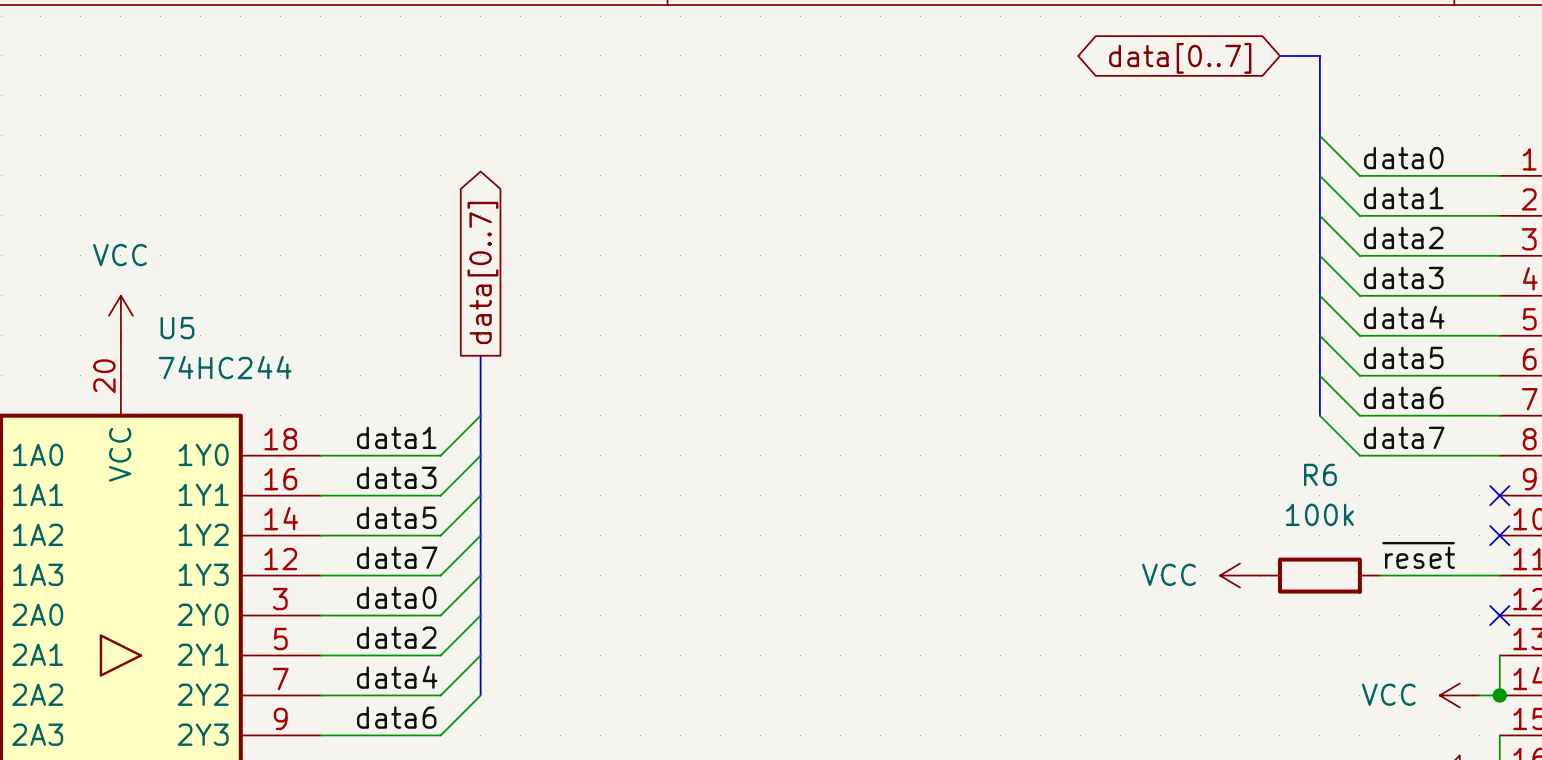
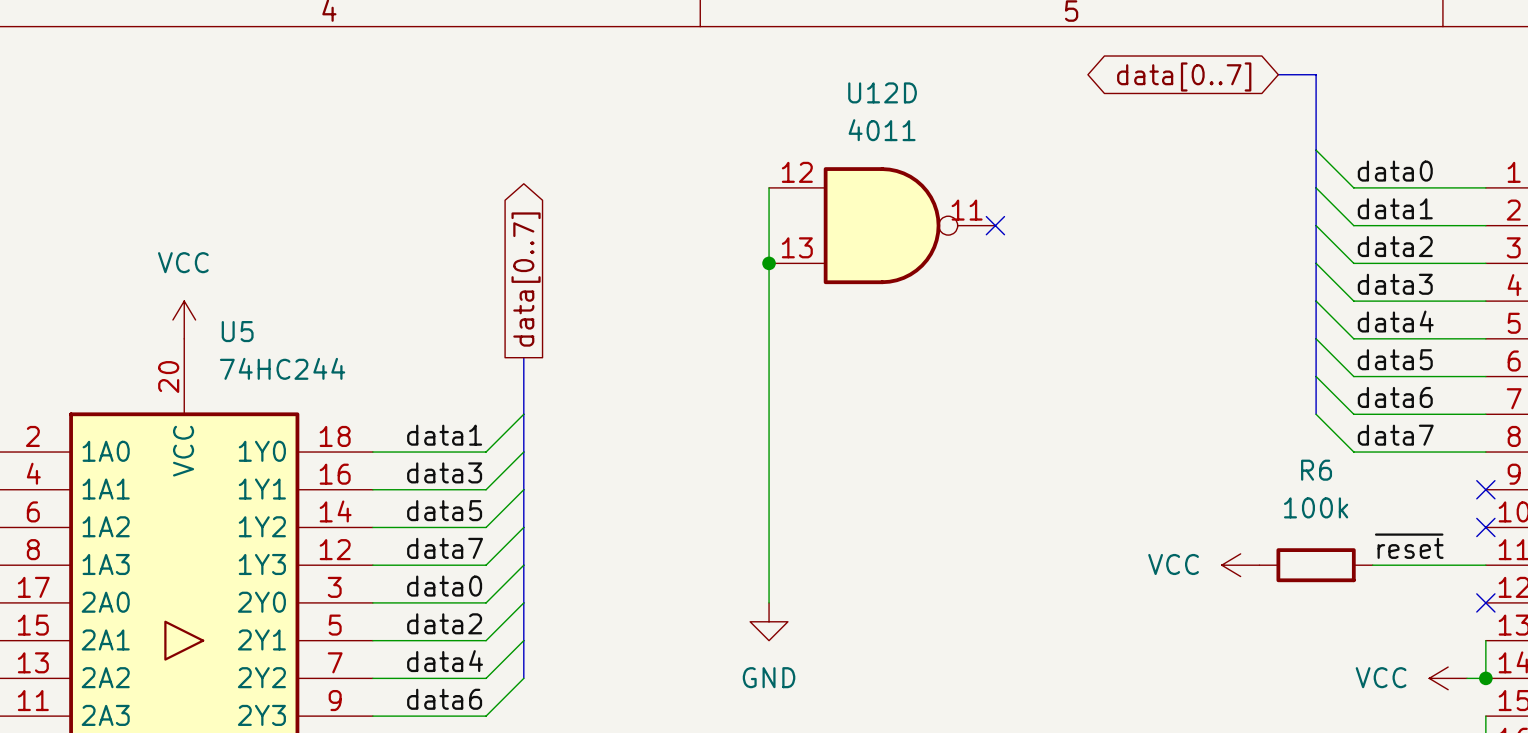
wire: none -> (769, 187) (769, 602)
U12D: none -> 4011 (882, 225)
no-connect mark: none -> (995, 225)
junction: none -> (769, 263)
power symbol: none -> GND (769, 621)

